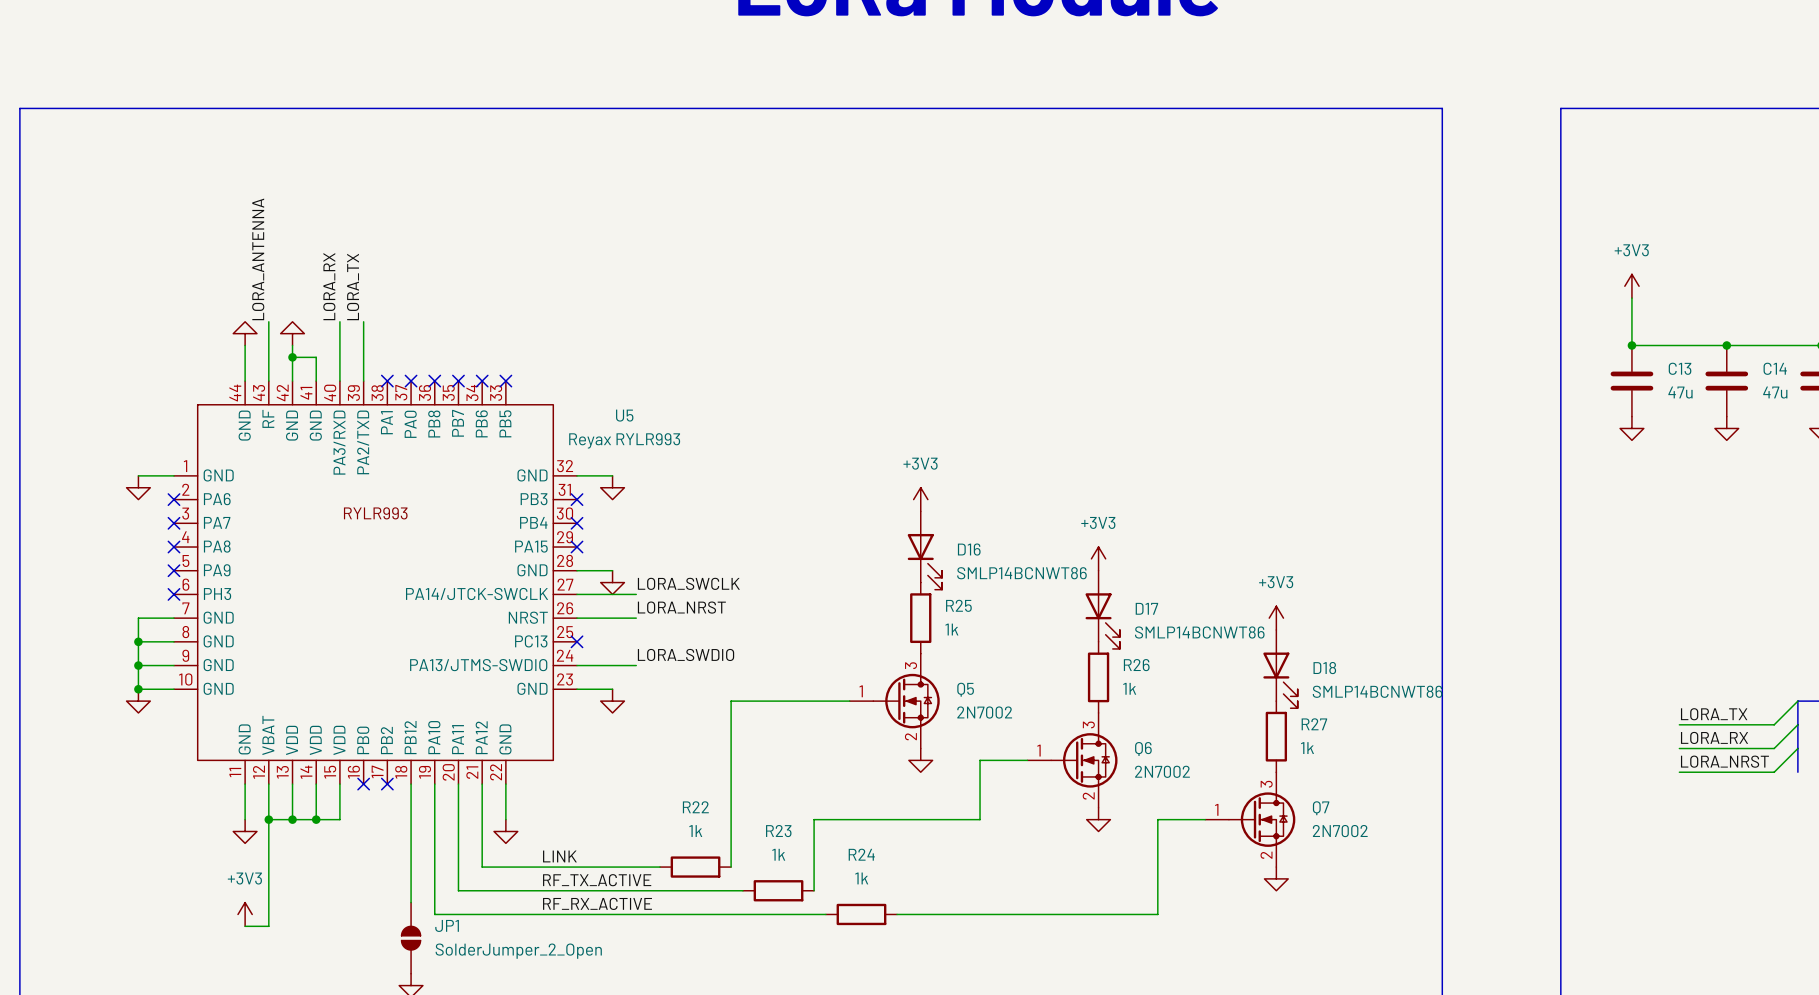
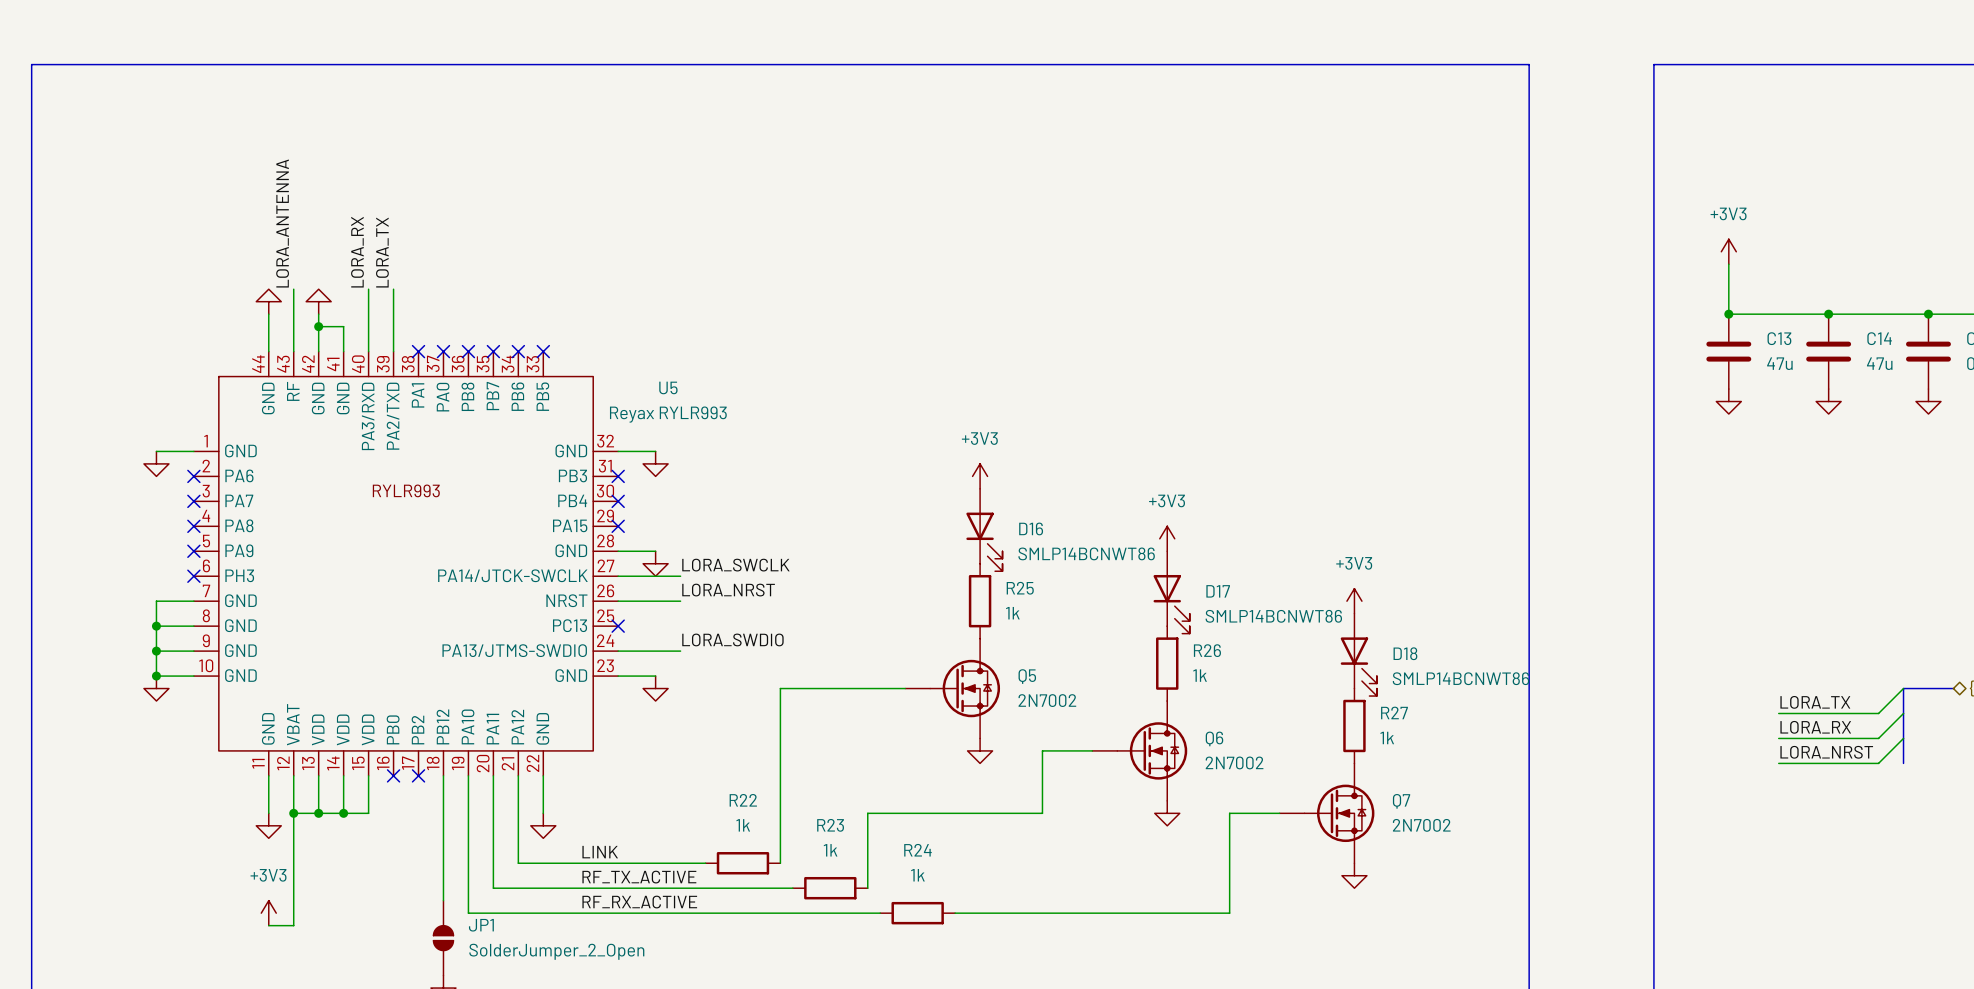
Q5 pin number: 3 (911, 665) -> none
Q5 pin number: 1 (861, 691) -> none
Q6 pin number: 3 (1088, 724) -> none
Q5 pin number: 2 (910, 736) -> none
Q6 pin number: 1 (1038, 750) -> none
Q7 pin number: 3 (1266, 784) -> none
Q6 pin number: 2 (1088, 795) -> none
Q7 pin number: 1 (1216, 809) -> none
Q7 pin number: 2 (1266, 855) -> none

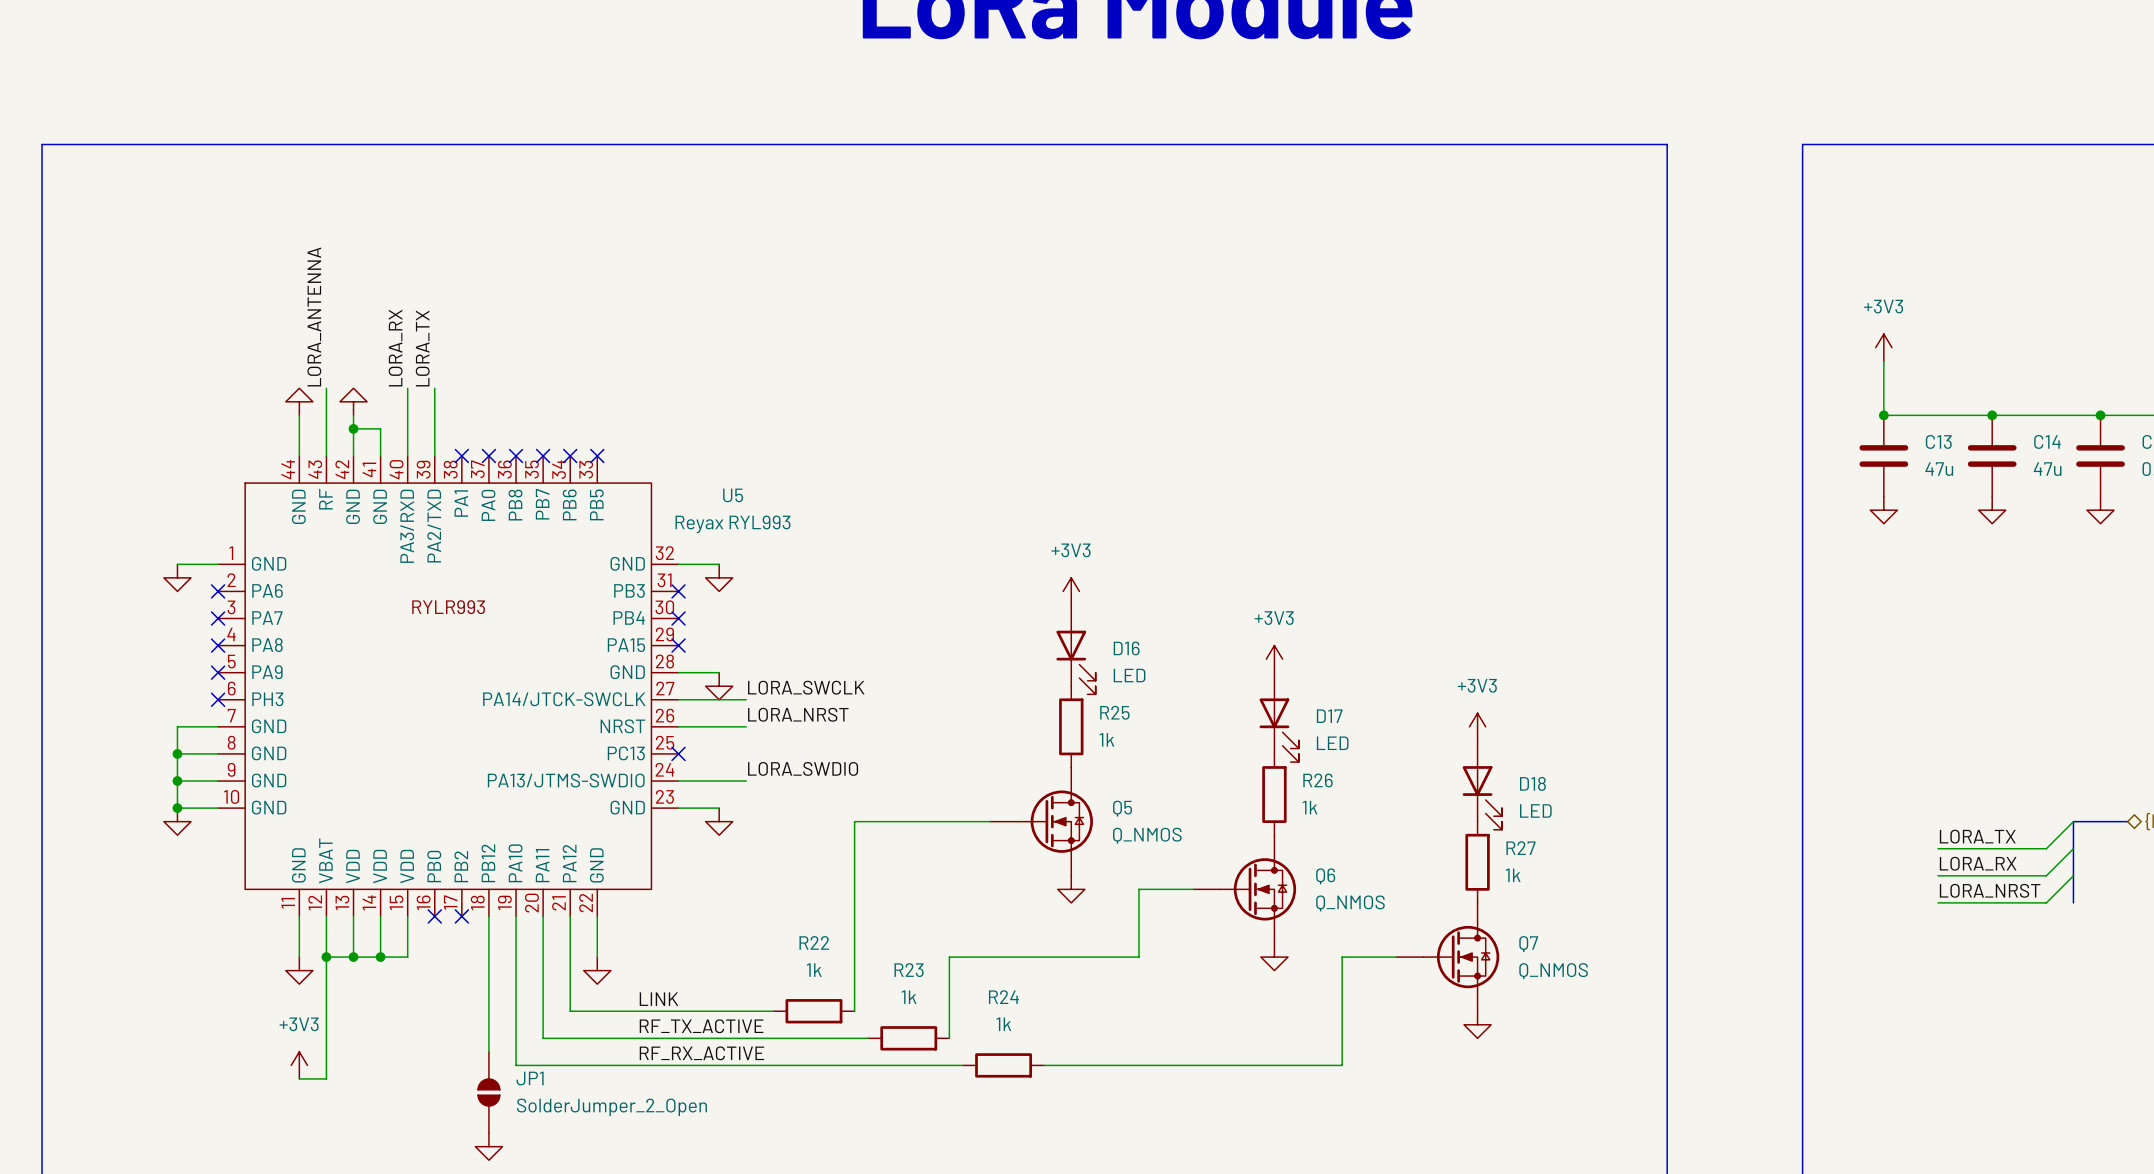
U5 value: Reyax RYLR993 (668, 414) -> Reyax RYL993 (732, 524)
D16 value: SMLP14BCNWT86 (1086, 553) -> LED (1129, 675)
D17 value: SMLP14BCNWT86 (1273, 616) -> LED (1332, 743)
D18 value: SMLP14BCNWT86 (1461, 678) -> LED (1535, 810)
Q5 value: 2N7002 (1047, 700) -> Q_NMOS (1147, 835)
Q6 value: 2N7002 (1234, 762) -> Q_NMOS (1350, 903)
Q7 value: 2N7002 (1421, 825) -> Q_NMOS (1553, 971)

